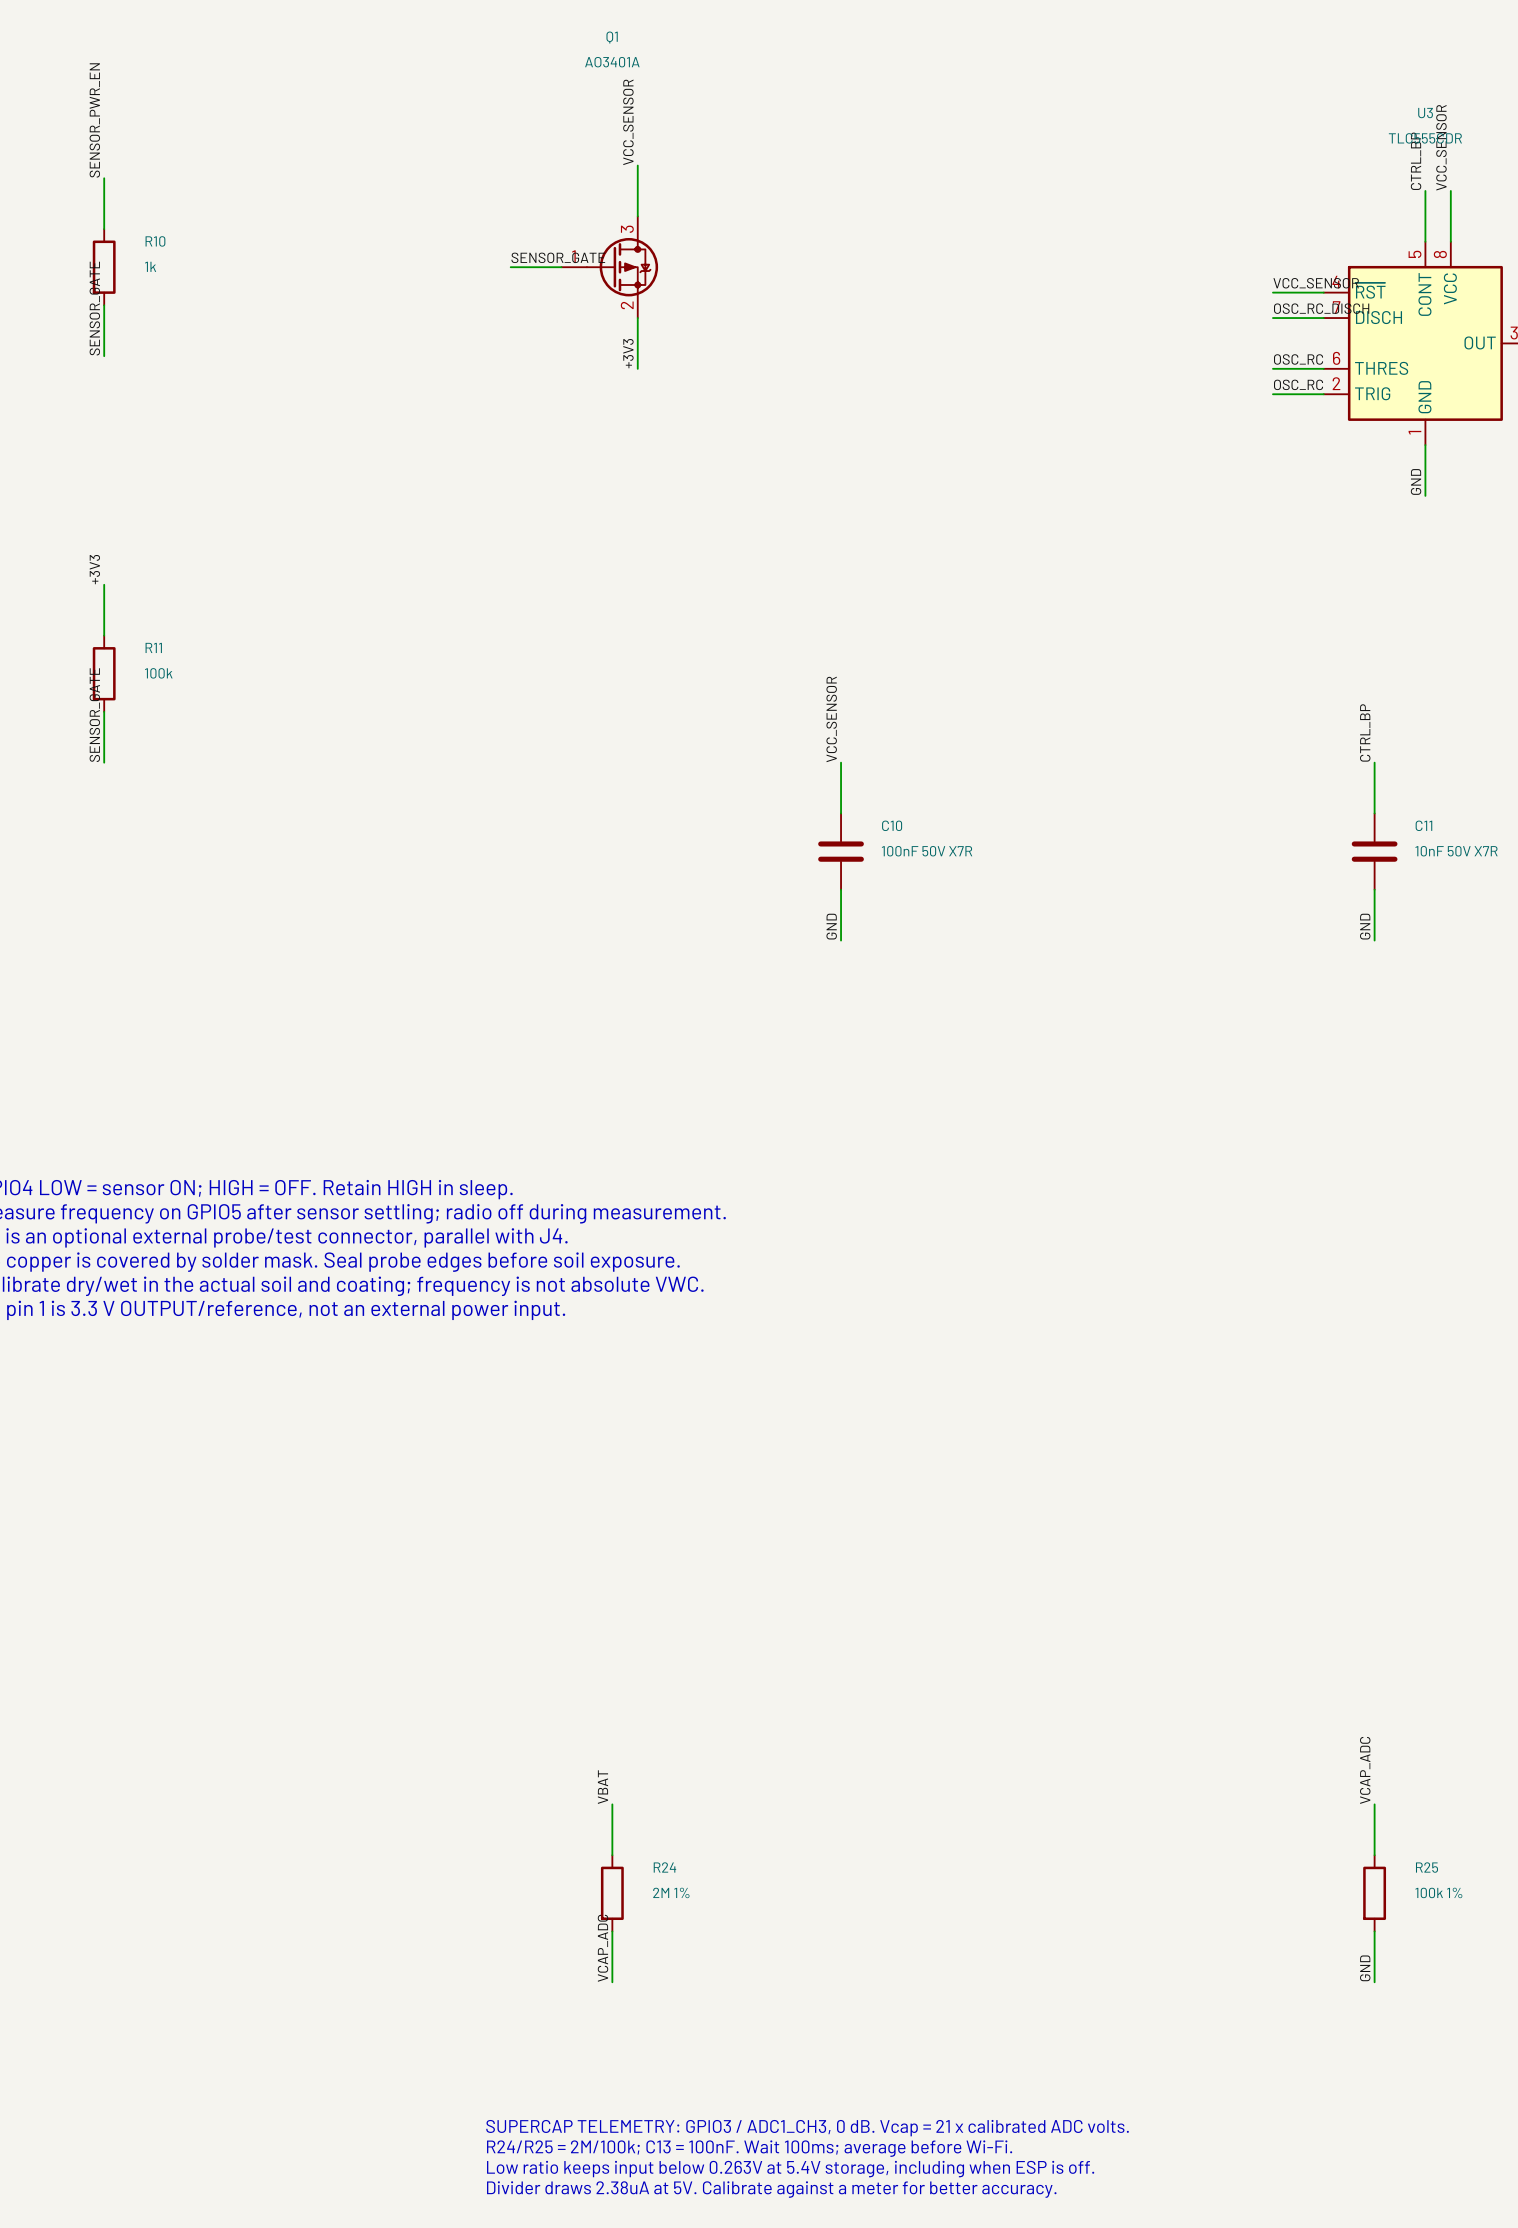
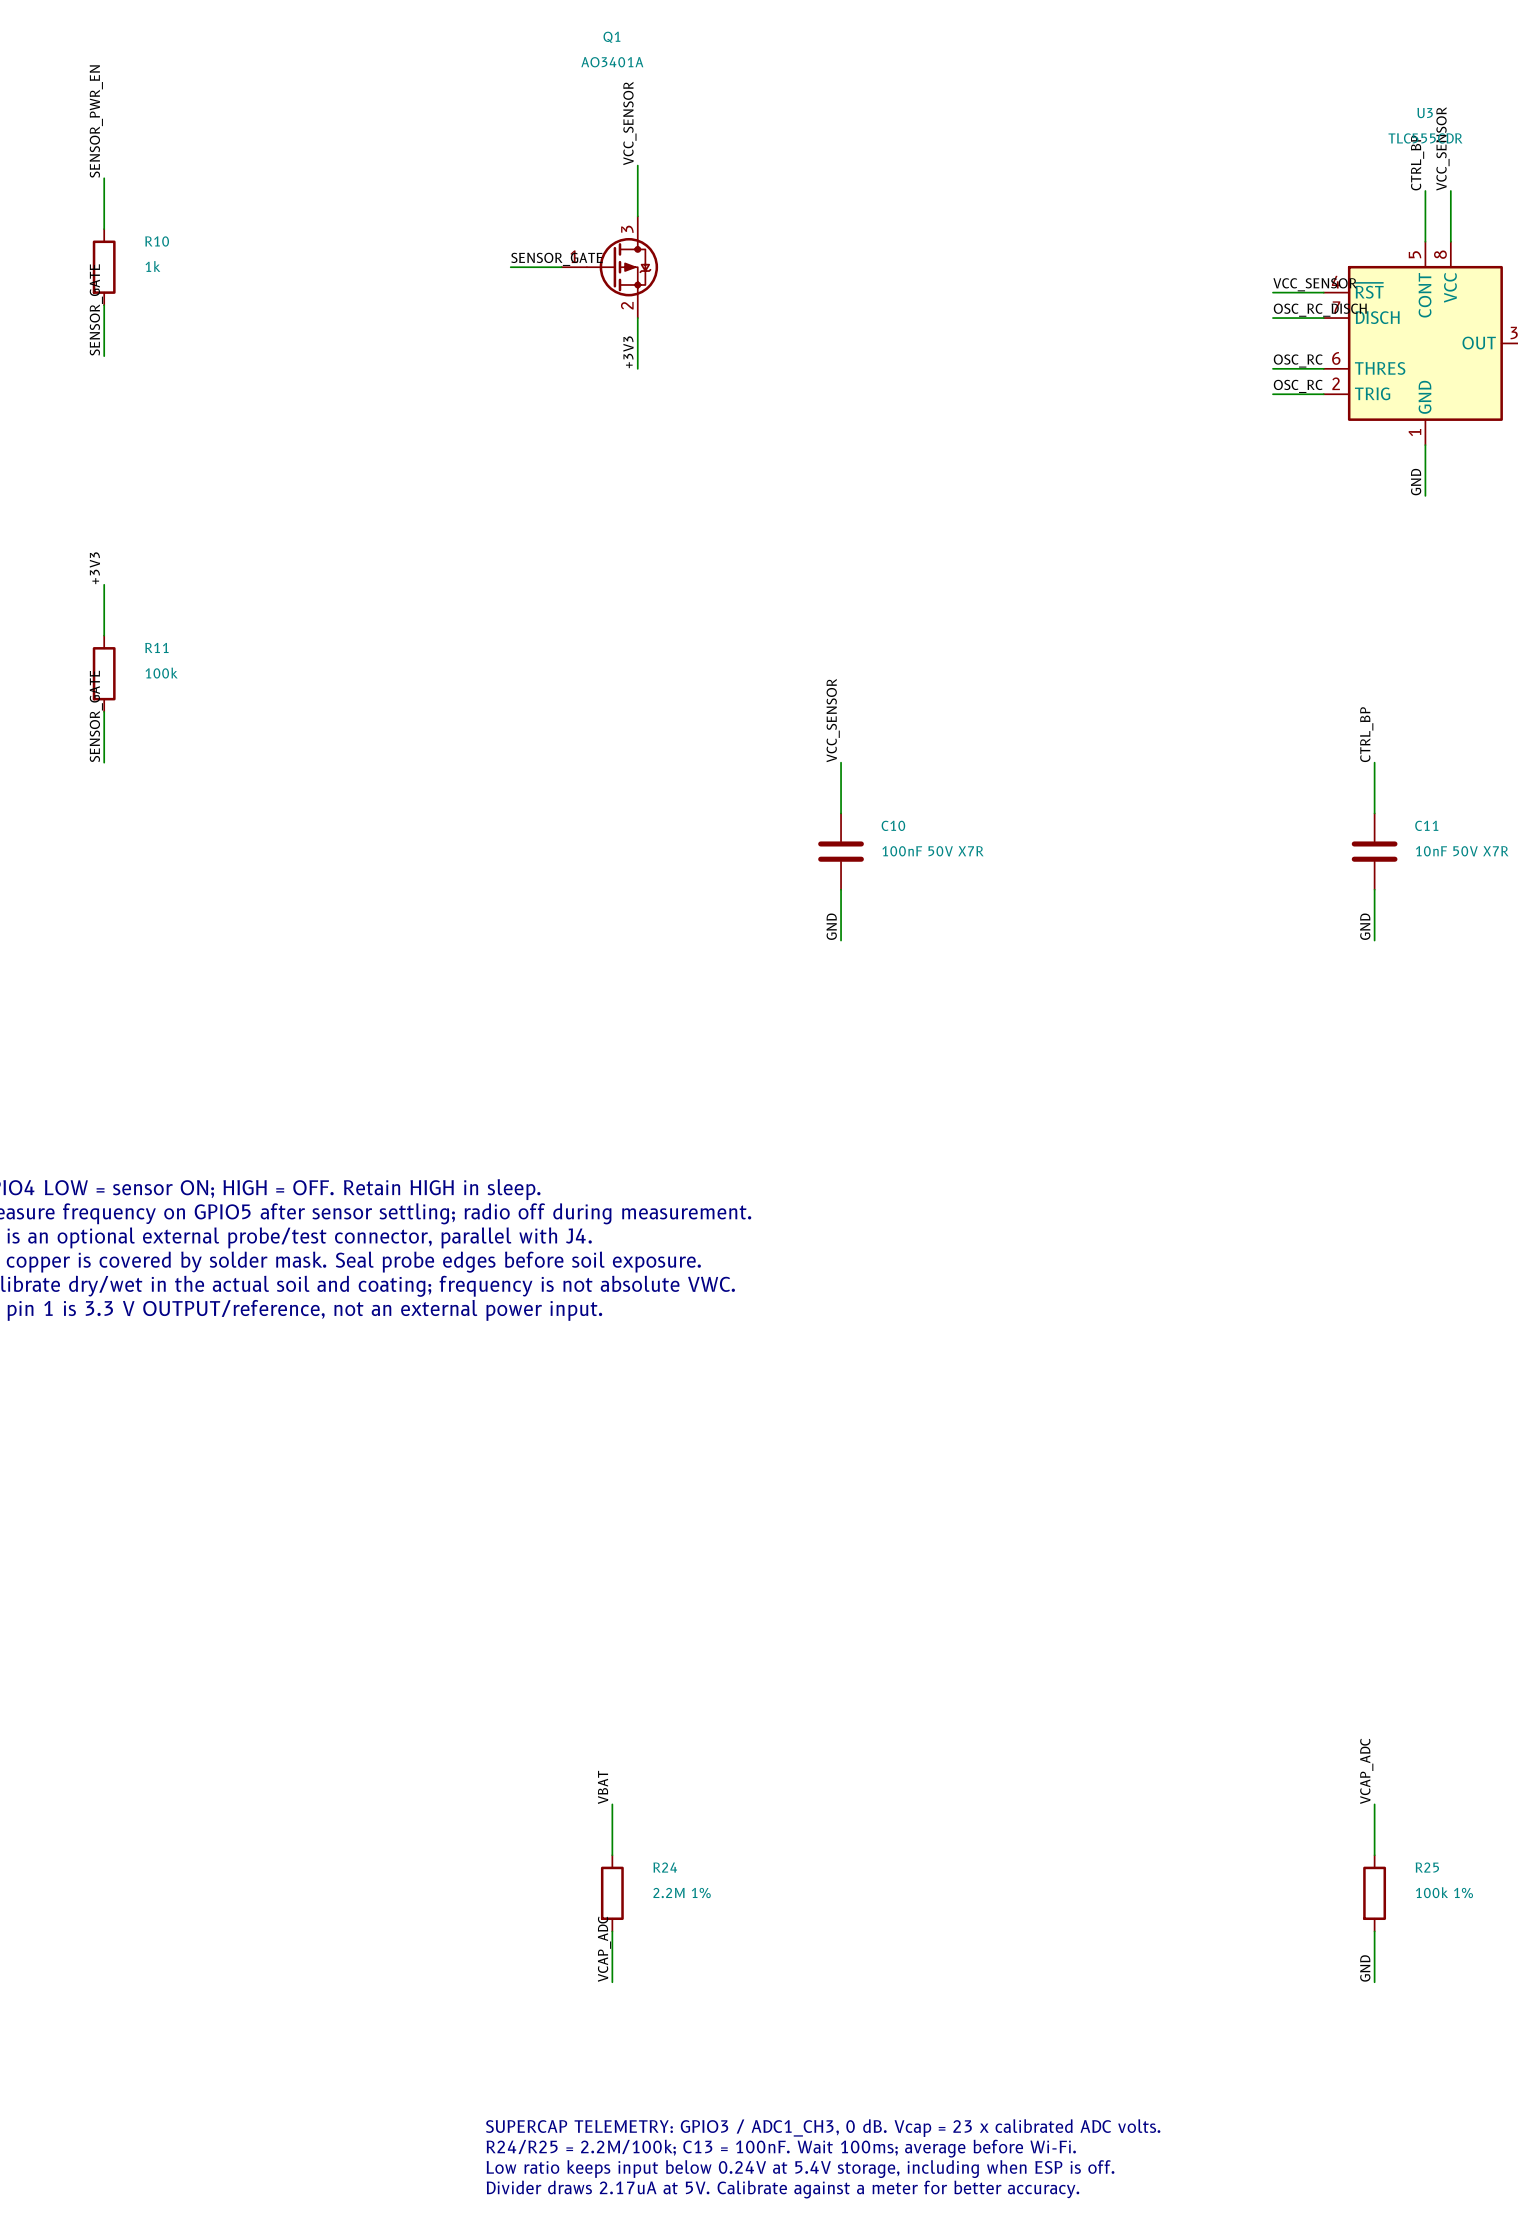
R24 value: 2M 1% (671, 1892) -> 2.2M 1% (682, 1893)
text: SUPERCAP TELEMETRY: GPIO3 / ADC1_CH3, 0 dB. Vcap = 21 x calibrated ADC volts. (807, 2128) -> SUPERCAP TELEMETRY: GPIO3 / ADC1_CH3, 0 dB. Vcap = 23 x calibrated ADC volts. (823, 2128)
text: R24/R25 = 2M/100k; C13 = 100nF. Wait 100ms; average before Wi-Fi. (749, 2148) -> R24/R25 = 2.2M/100k; C13 = 100nF. Wait 100ms; average before Wi-Fi. (781, 2148)
text: Low ratio keeps input below 0.263V at 5.4V storage, including when ESP is off. (790, 2169) -> Low ratio keeps input below 0.24V at 5.4V storage, including when ESP is off. (800, 2169)
text: Divider draws 2.38uA at 5V. Calibrate against a meter for better accuracy. (771, 2189) -> Divider draws 2.17uA at 5V. Calibrate against a meter for better accuracy. (783, 2189)

